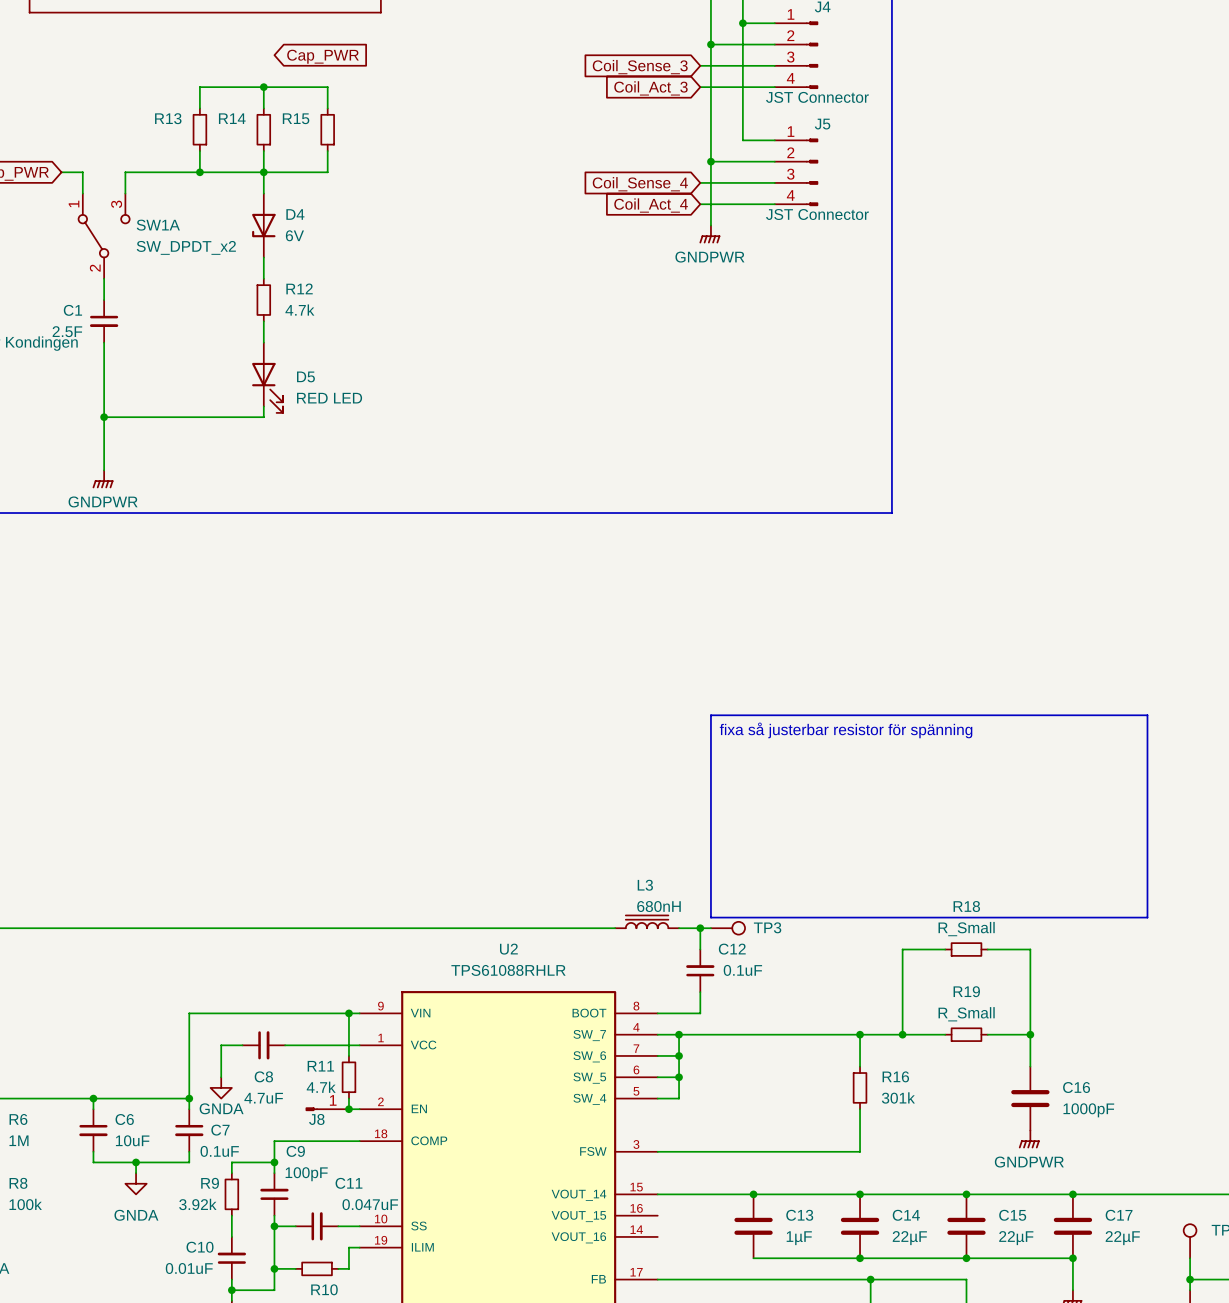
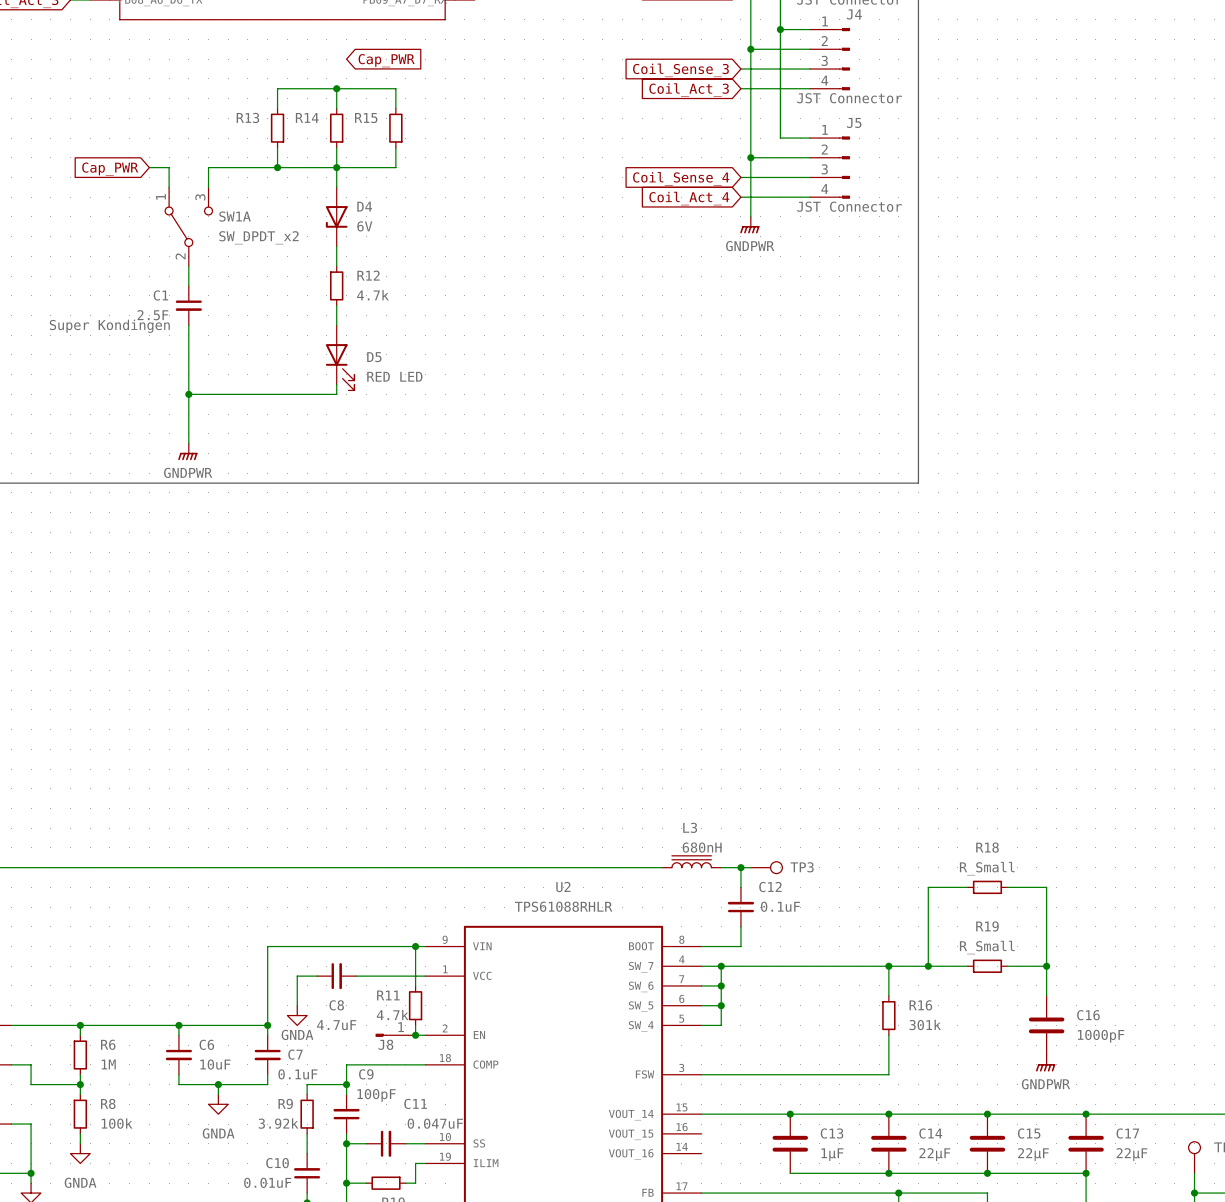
line: (710, 715) (1147, 715) (1147, 917) (710, 917) (710, 715) -> none
text: fixa så justerbar resistor för spänning (846, 730) -> none

